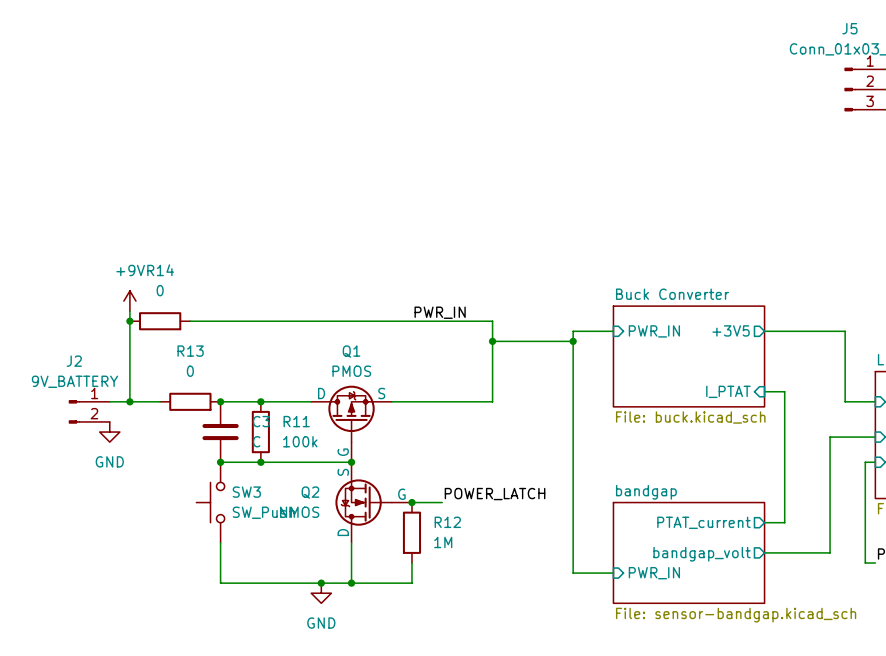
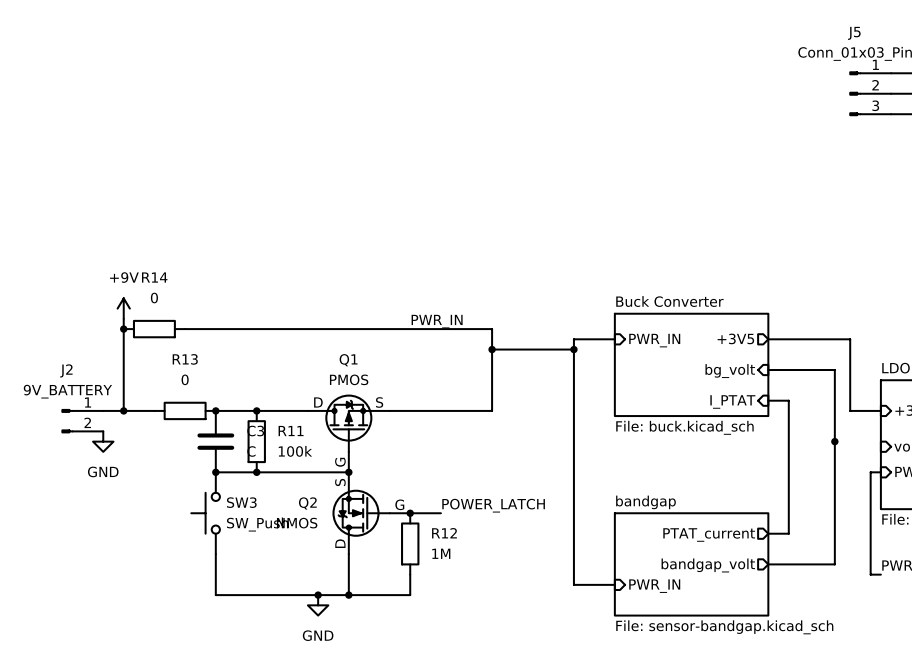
sheet pin: none -> bg_volt (730, 371)
junction: none -> (834, 441)
wire: (830, 437) (875, 437) -> (834, 446) (834, 370) (768, 370)

